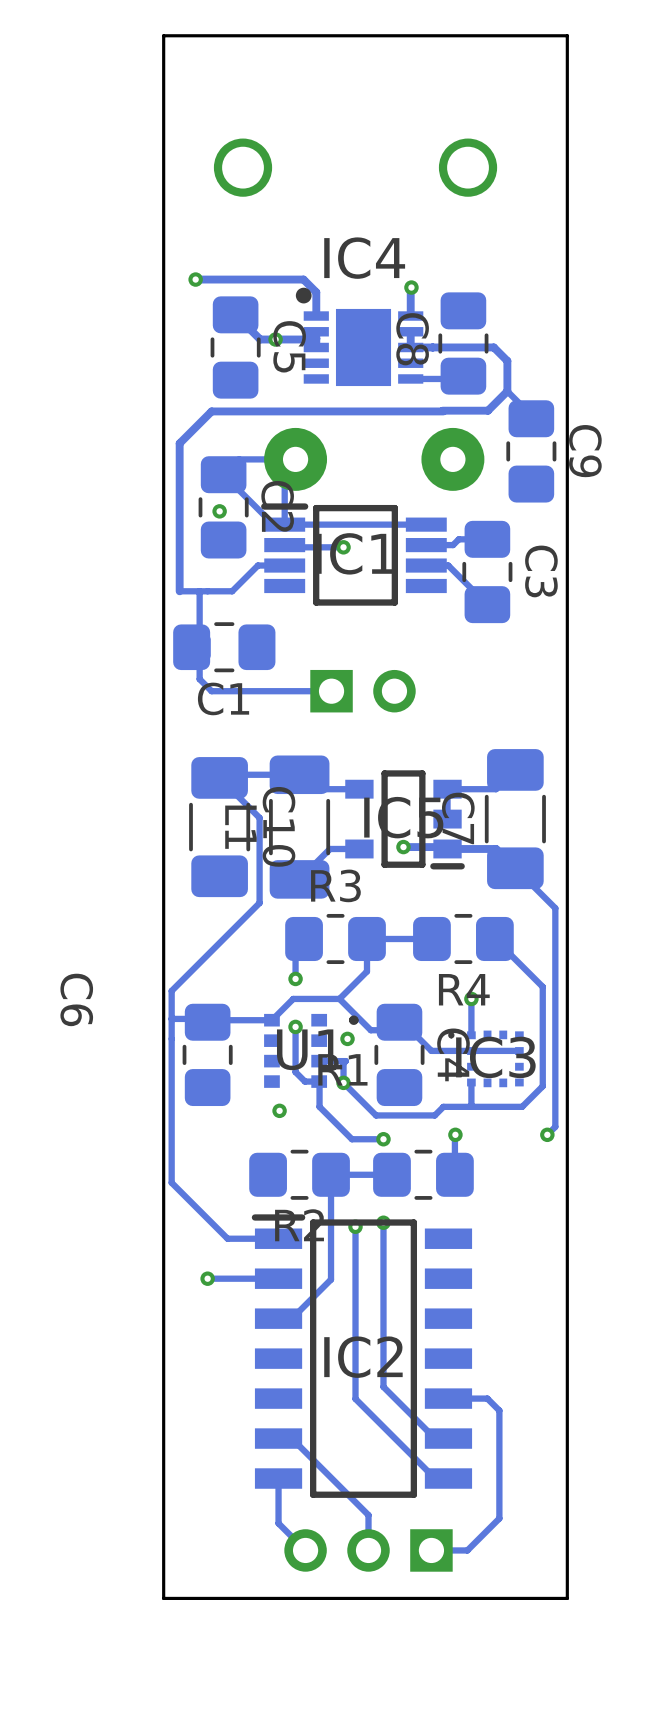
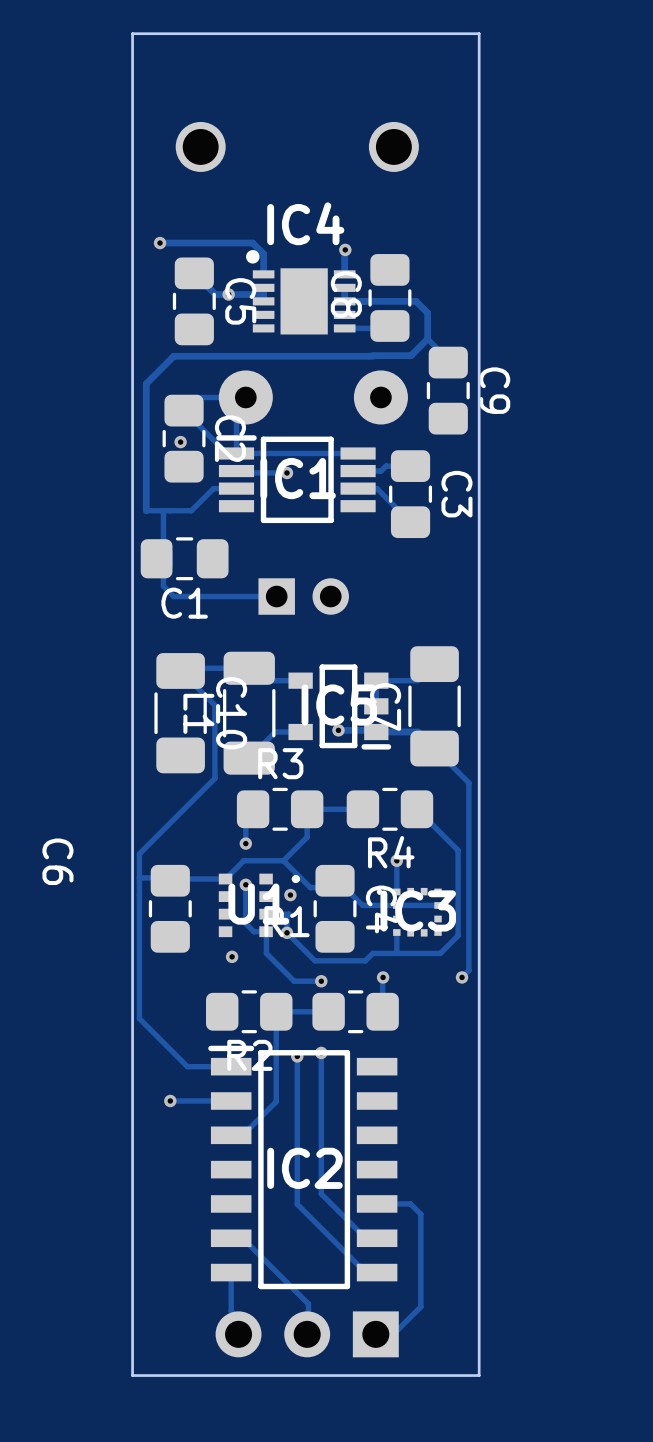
part footprint: [284, 1529, 453, 1572] -> [215, 1311, 399, 1358]

